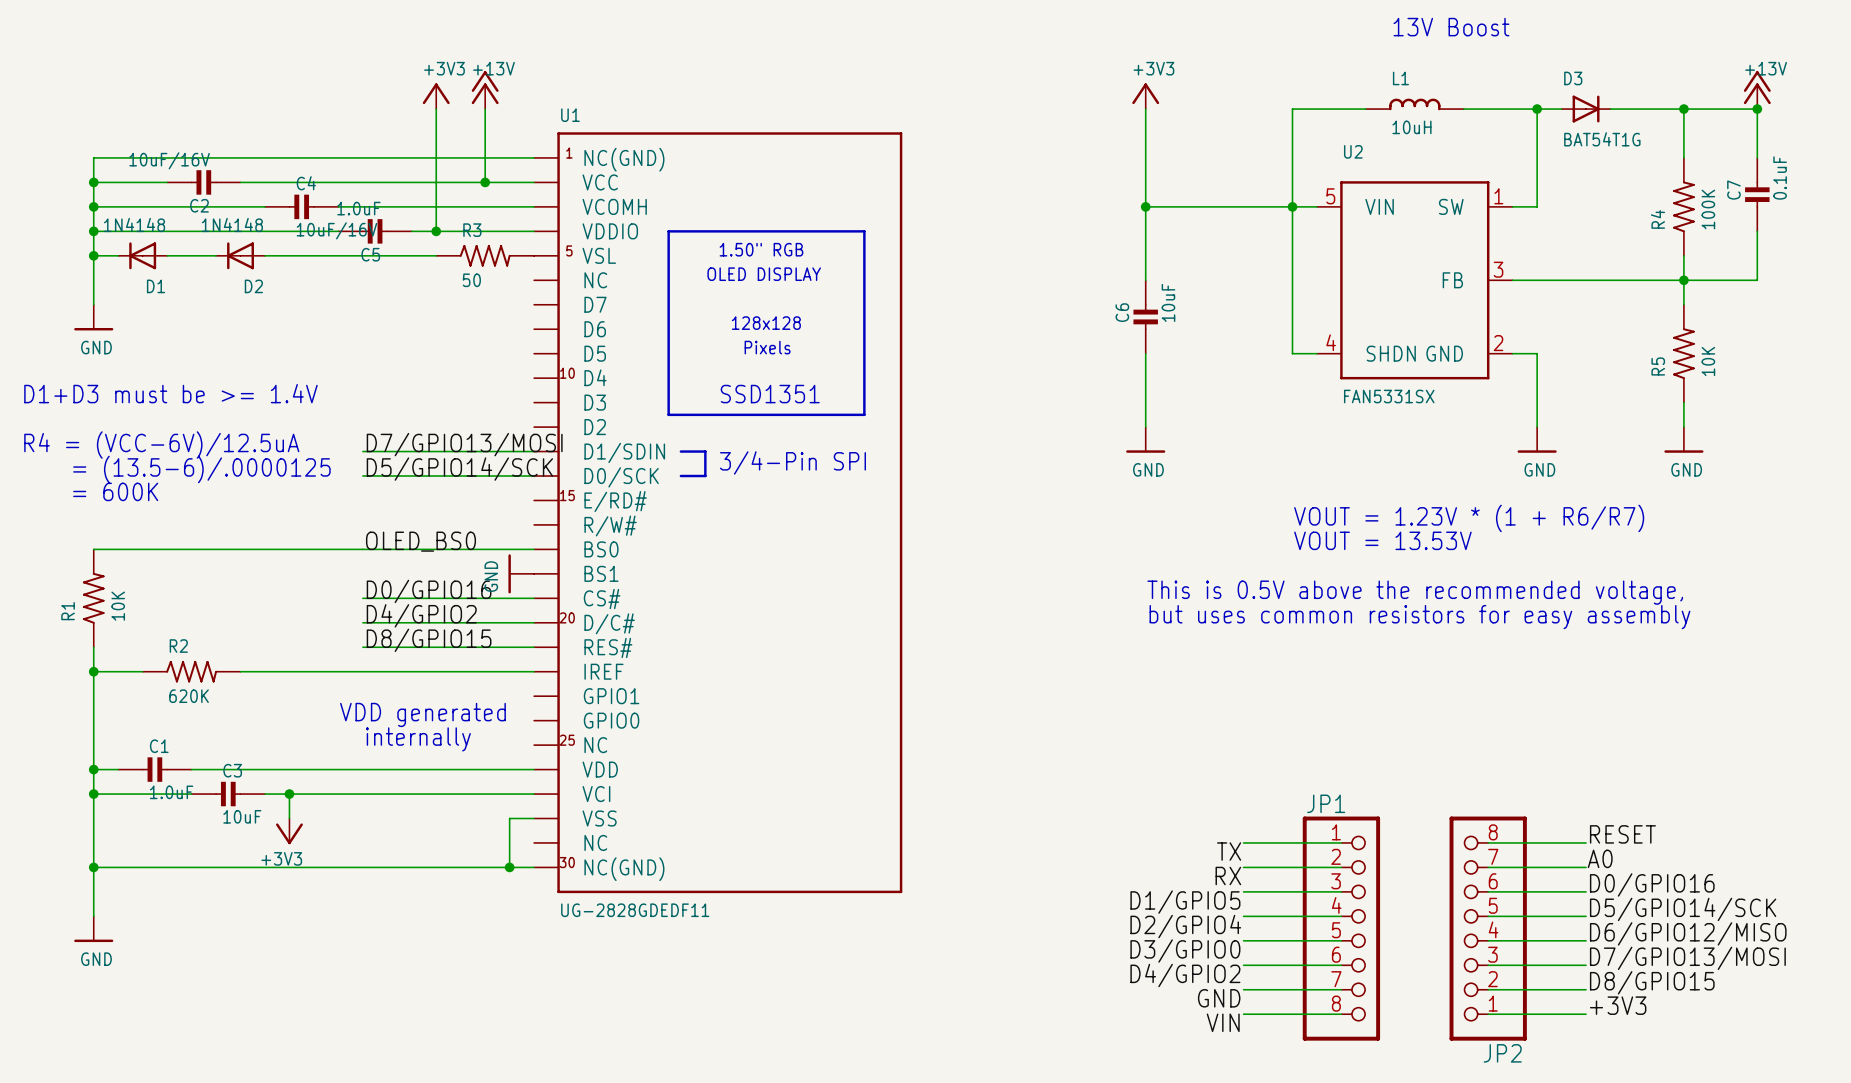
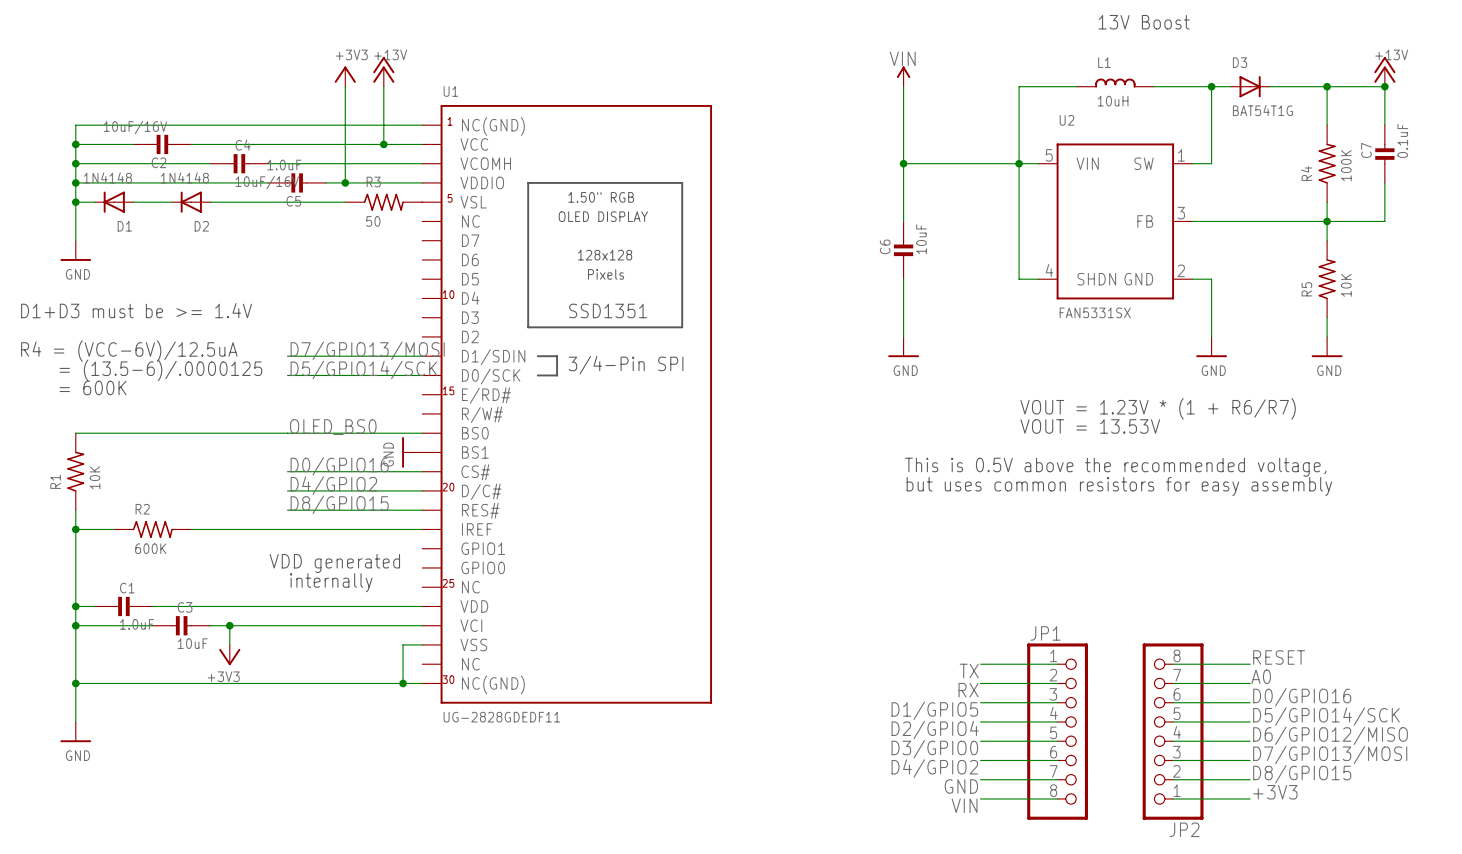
power symbol: +3V3 (1145, 96) -> VIN (903, 76)
R2 value: 620K (189, 696) -> 600K (150, 548)

